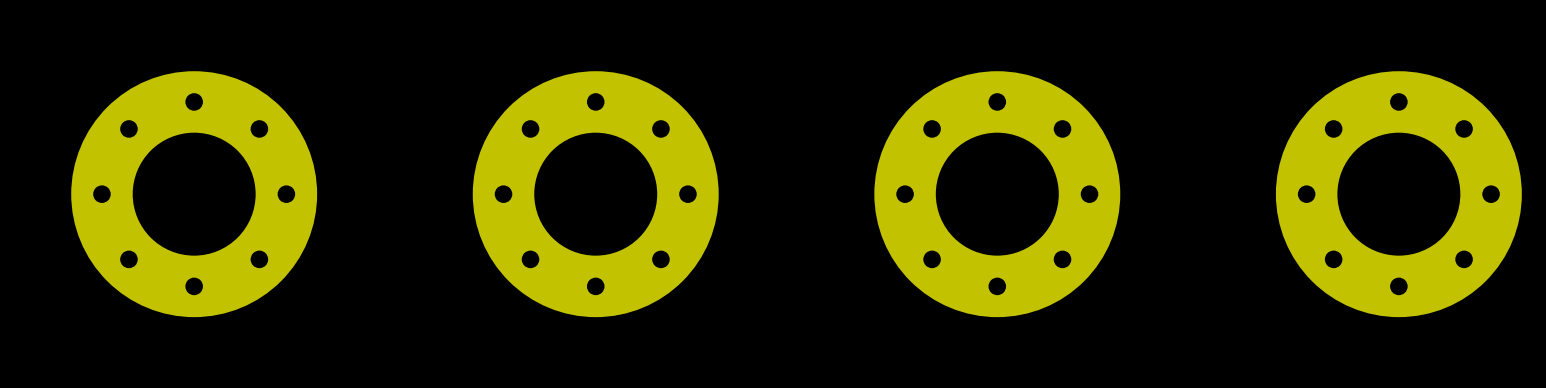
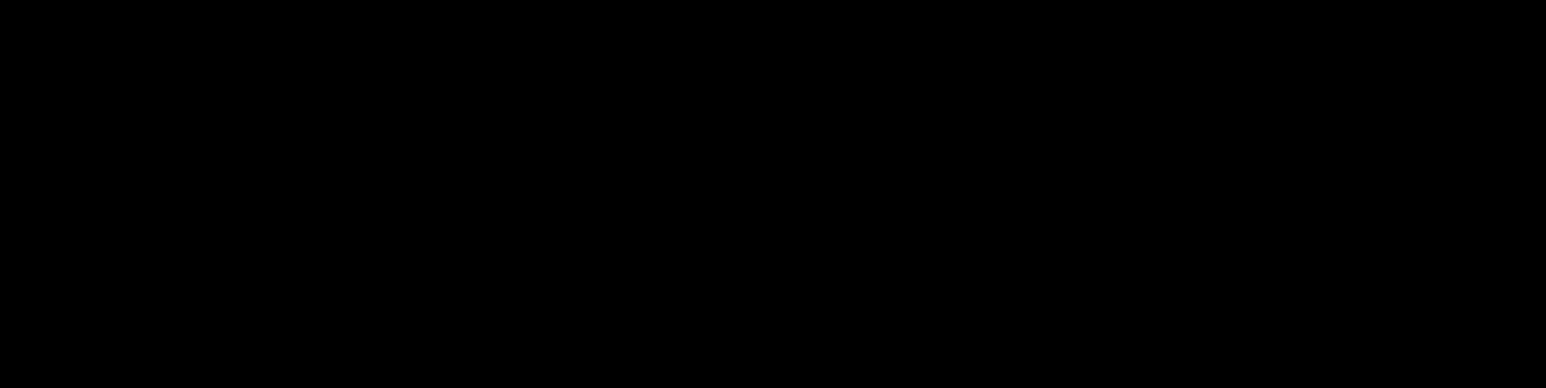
part: (194, 194) -> none
part: (595, 194) -> none
part: (997, 194) -> none
part: (1398, 194) -> none

